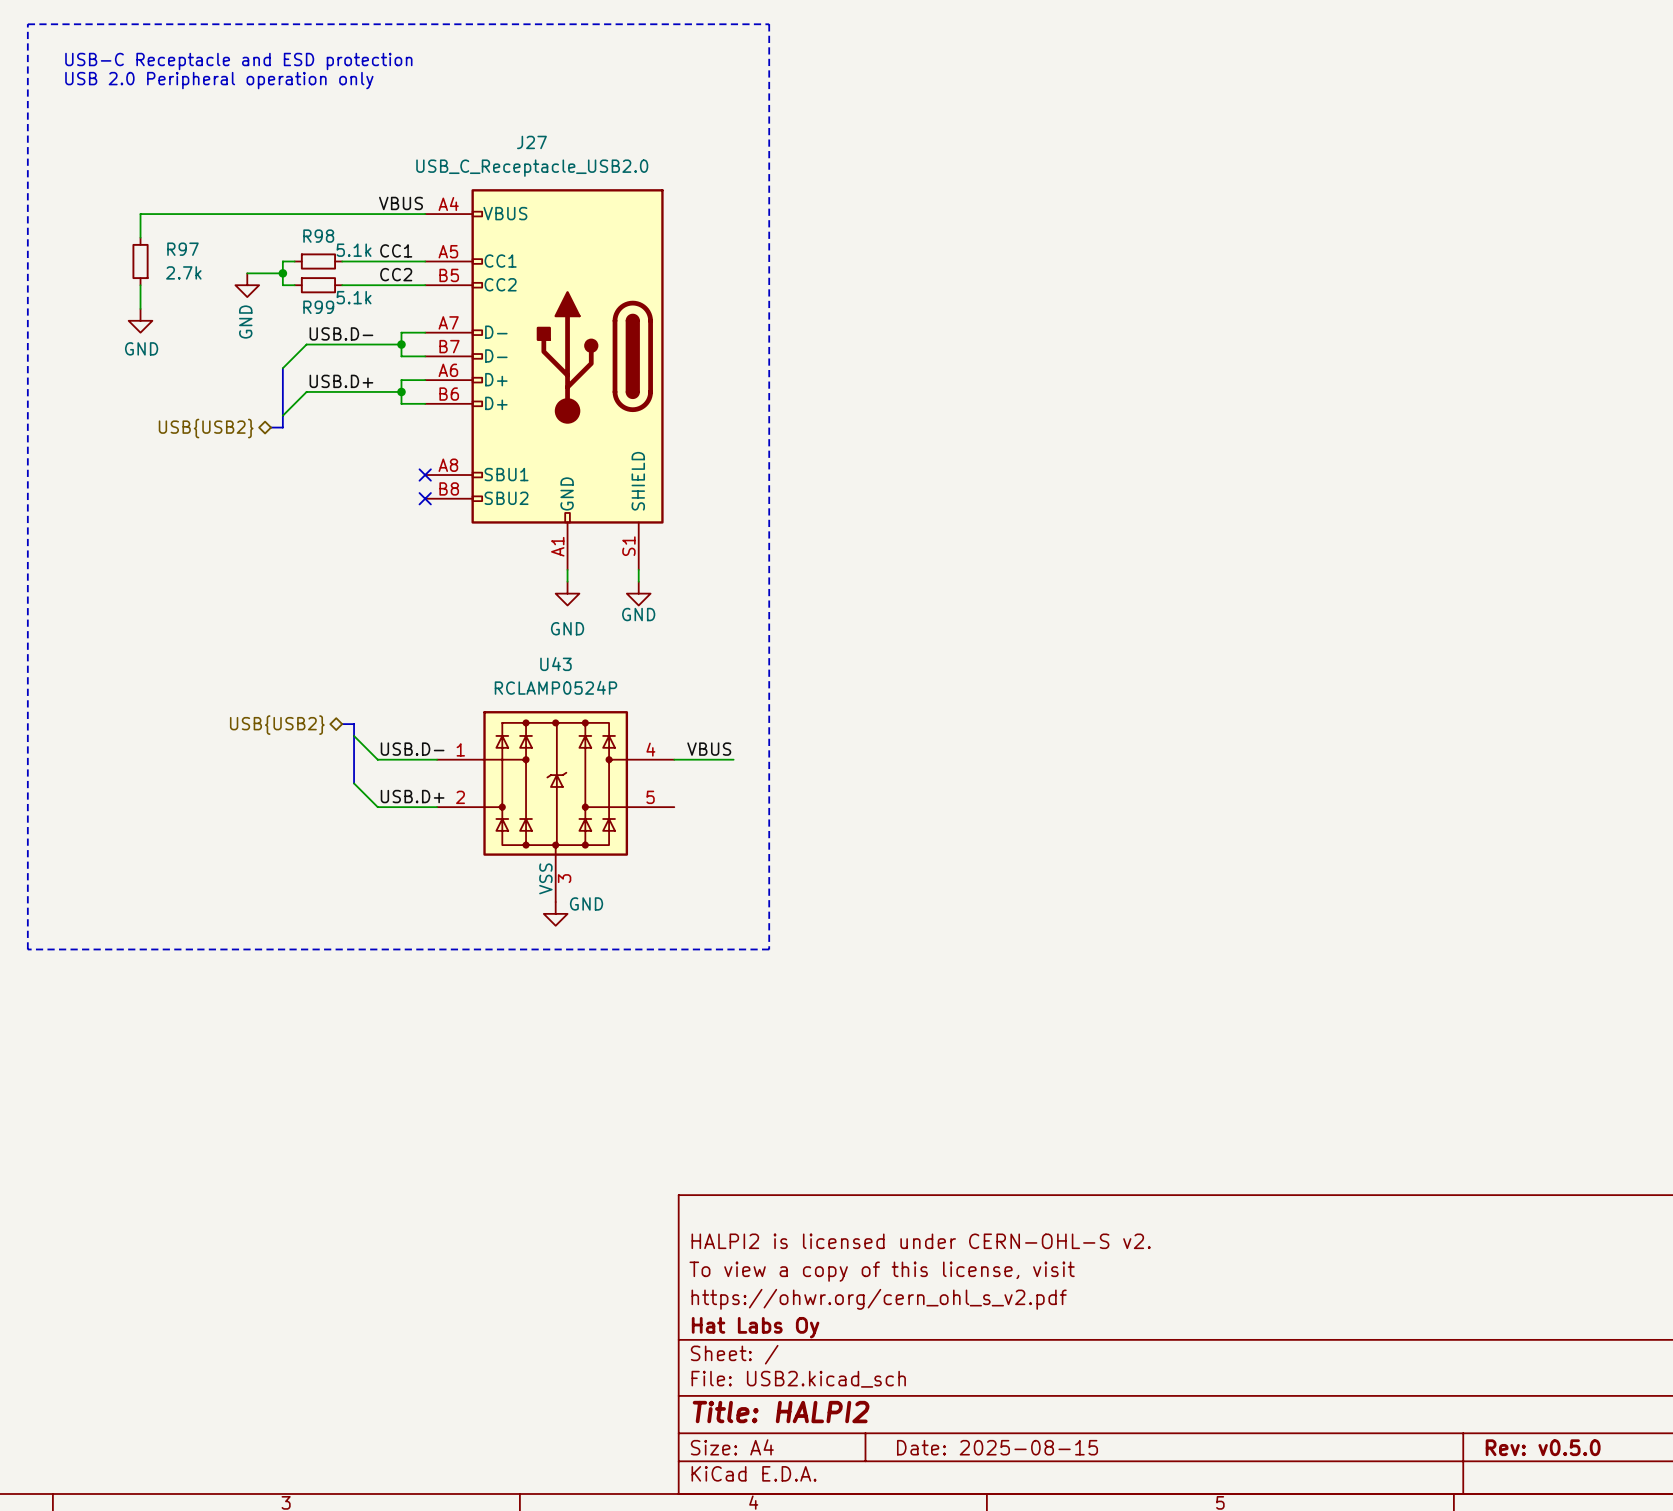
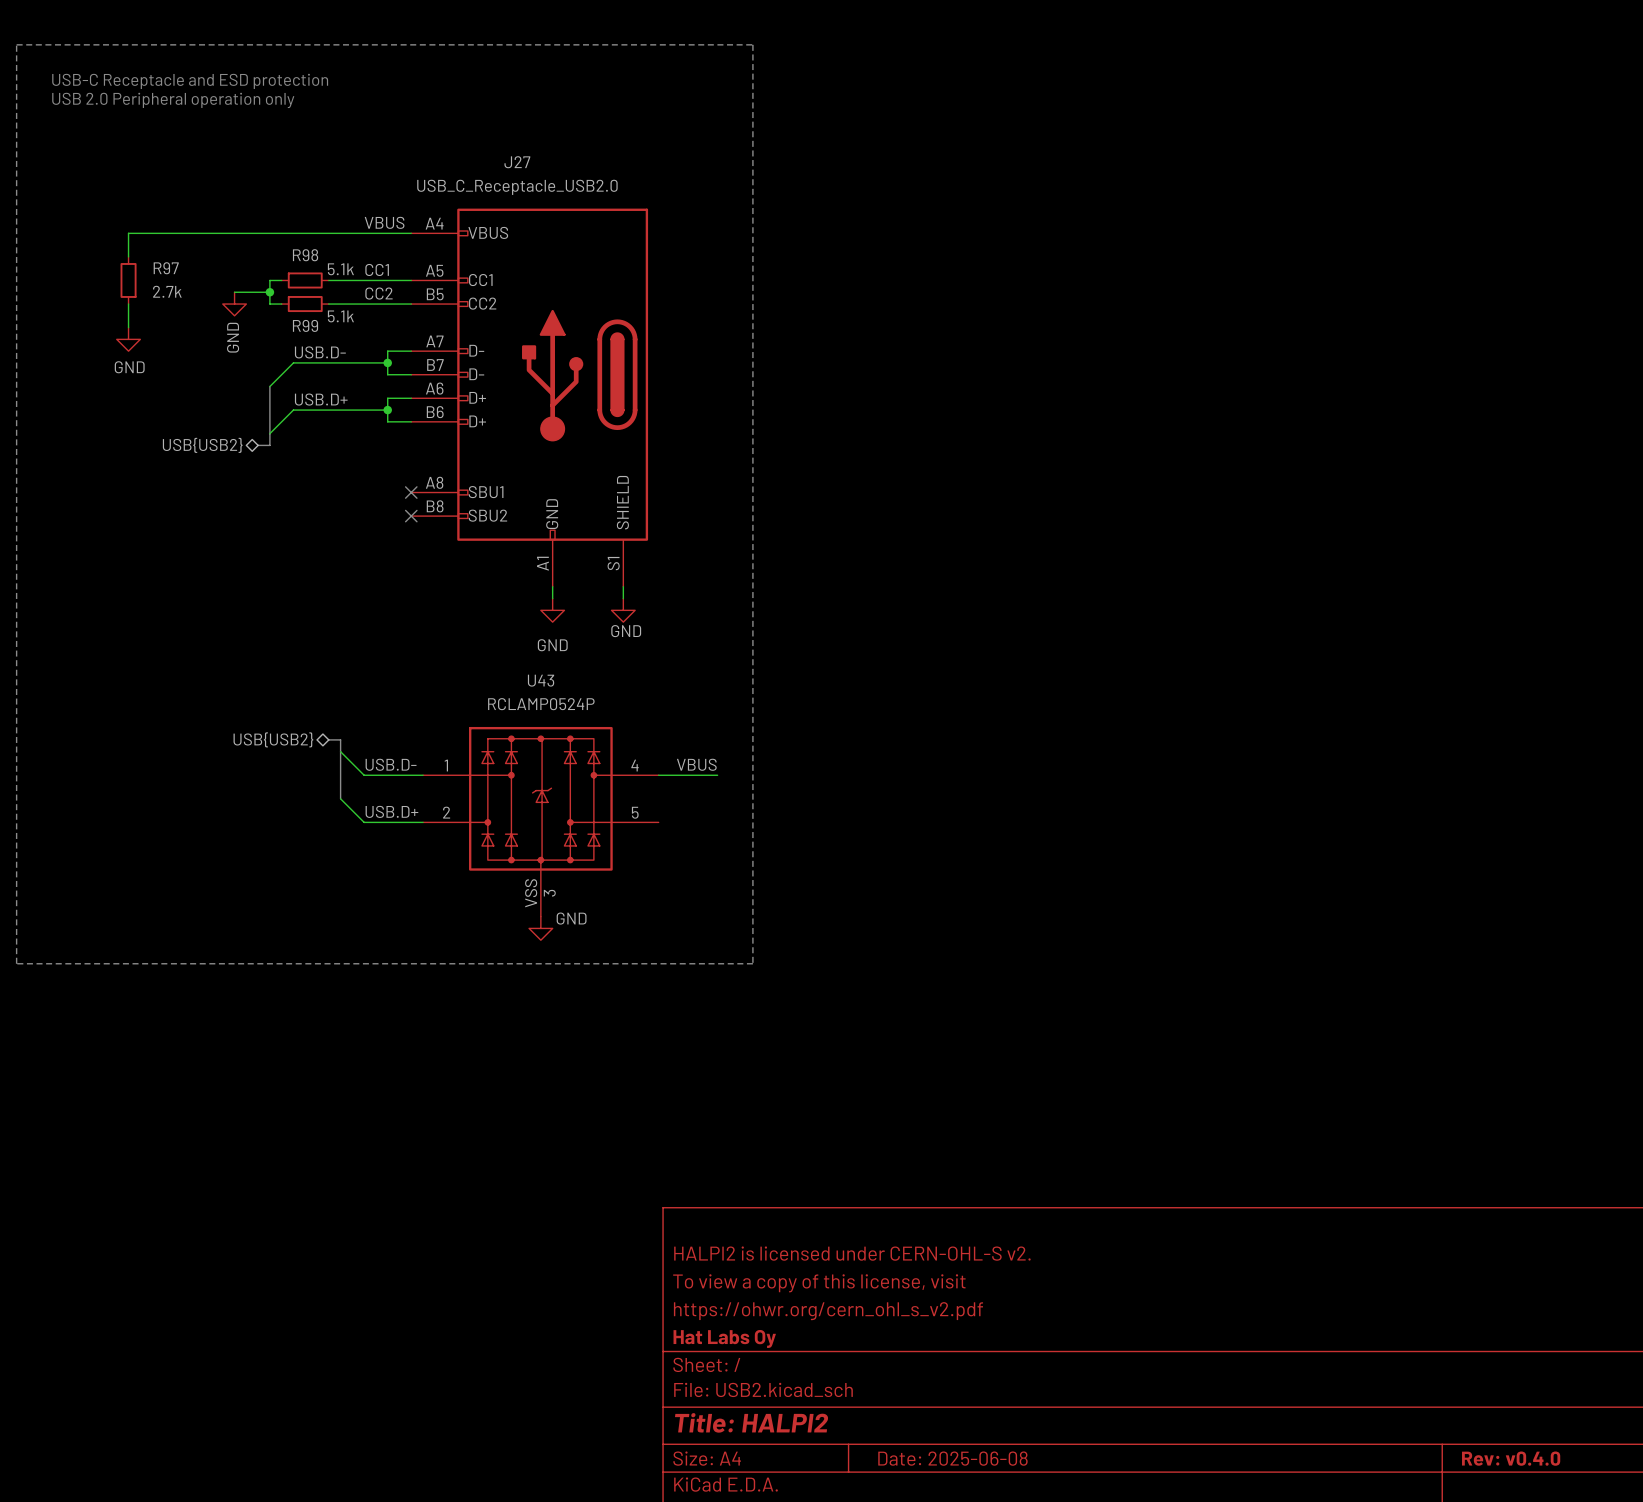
title block: Date: 2025-08-15 (997, 1447) -> Date: 2025-06-08 (952, 1458)
title block: Rev: v0.5.0 (1543, 1447) -> Rev: v0.4.0 (1511, 1458)

